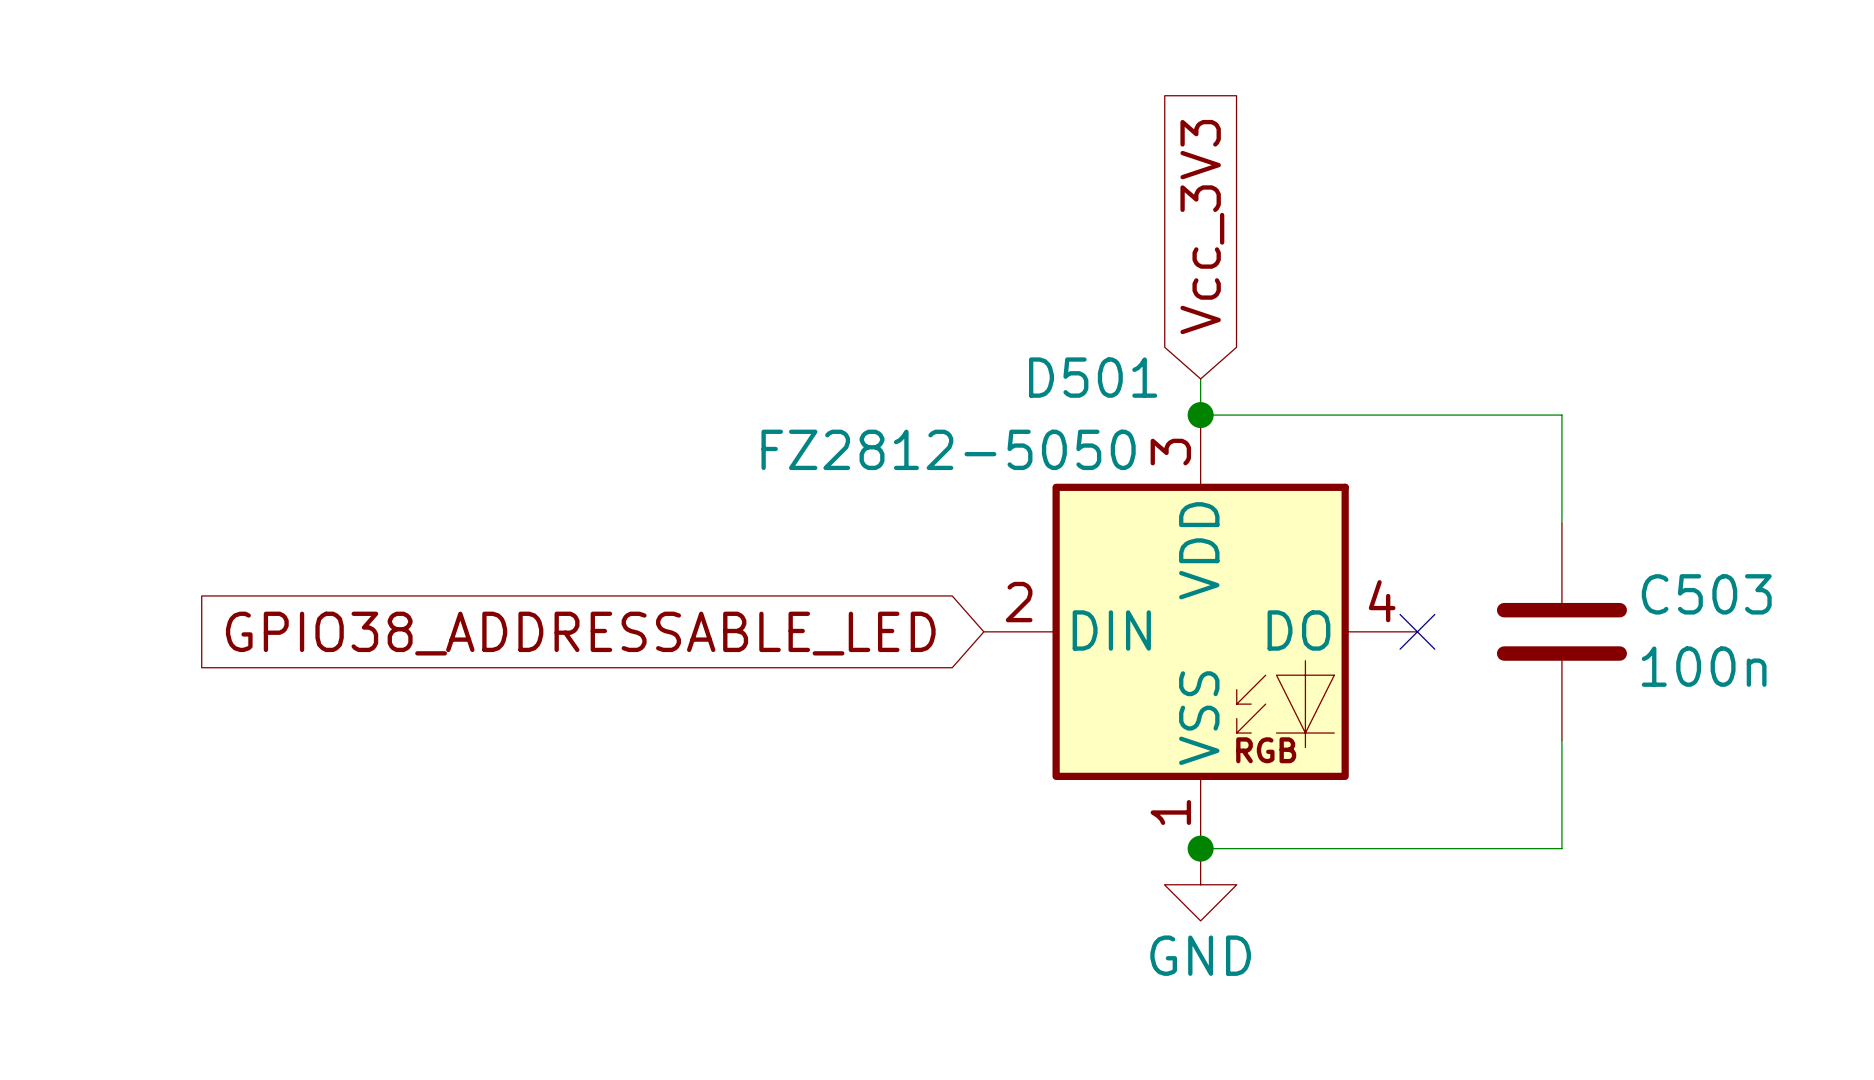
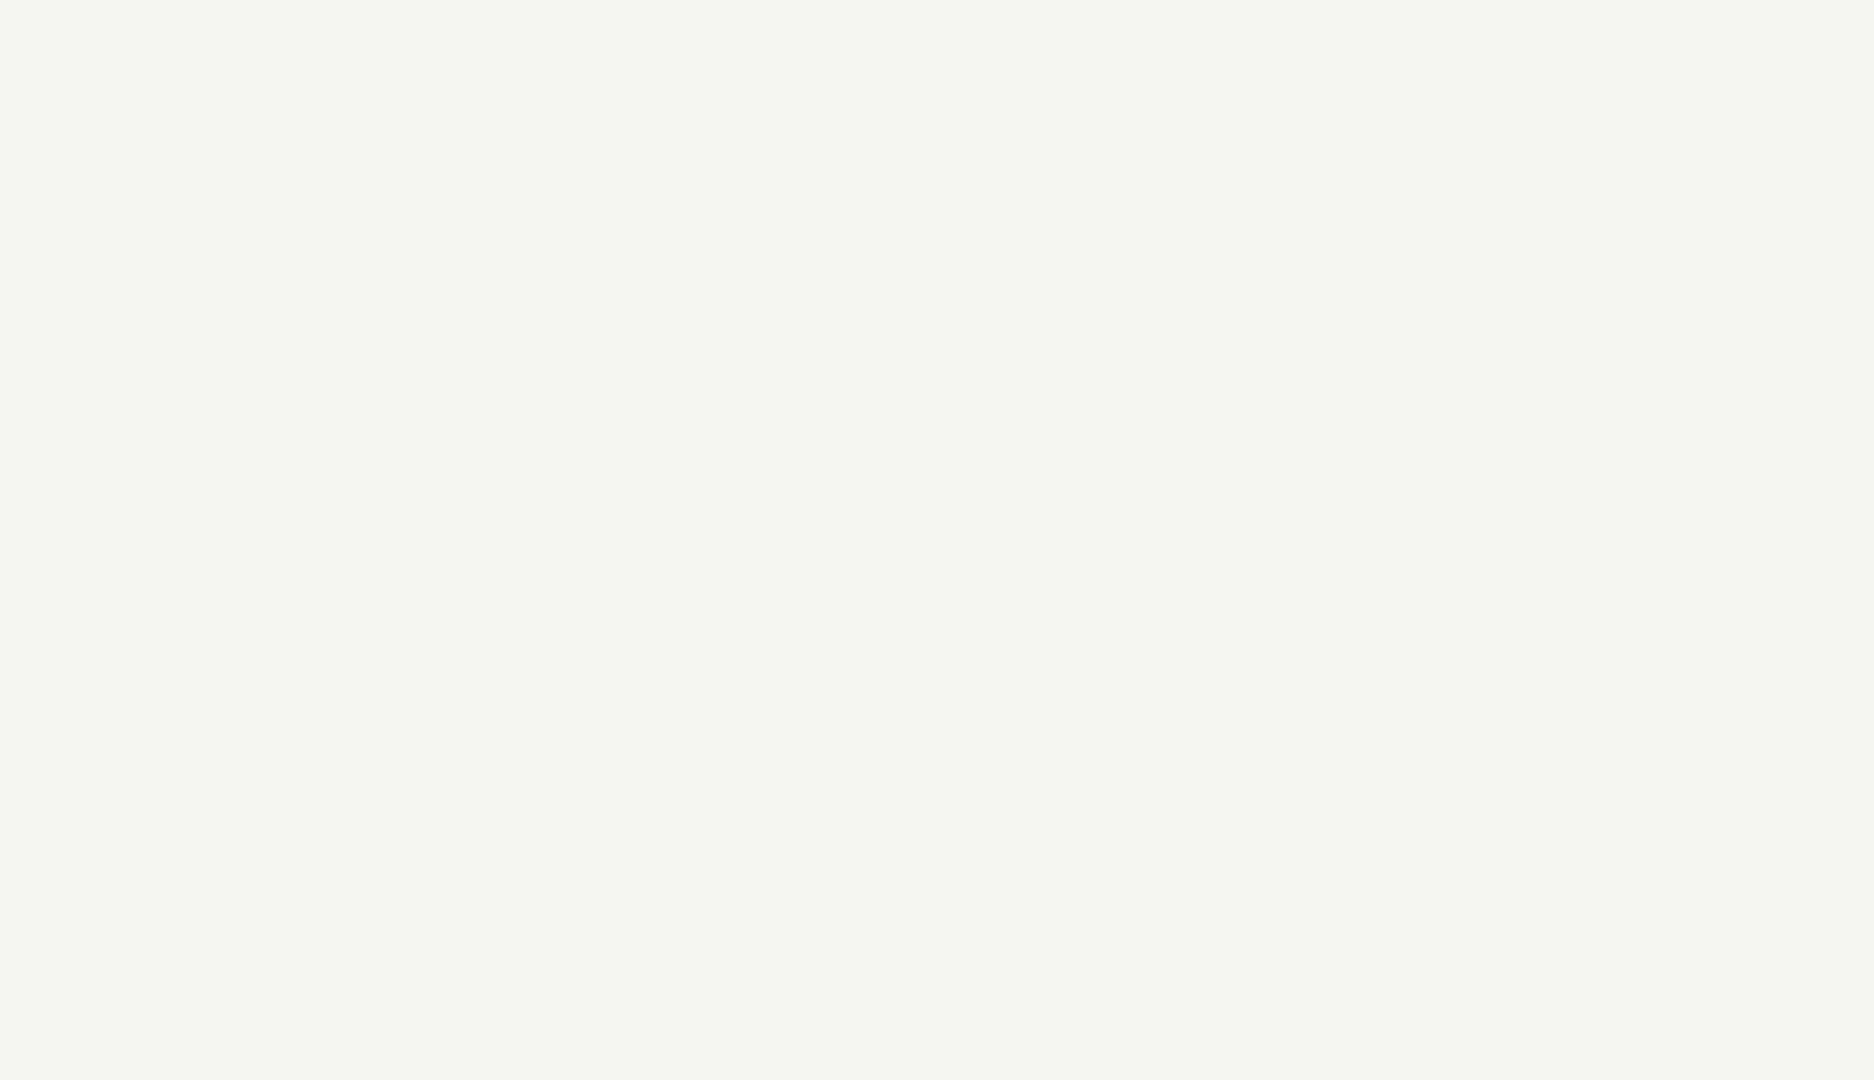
global label: Vcc_3V3 (1202, 227) -> none
wire: (1200, 378) (1200, 415) (1561, 415) (1561, 523) -> none
junction: (1200, 415) -> none
D501: FZ2812-5050 (1200, 631) -> none
no-connect mark: (1417, 631) -> none
C503: 100n (1561, 631) -> none
global label: GPIO38_ADDRESSABLE_LED (580, 633) -> none
wire: (1561, 740) (1561, 848) (1200, 848) -> none
junction: (1200, 848) -> none
power symbol: GND (1200, 884) -> none

